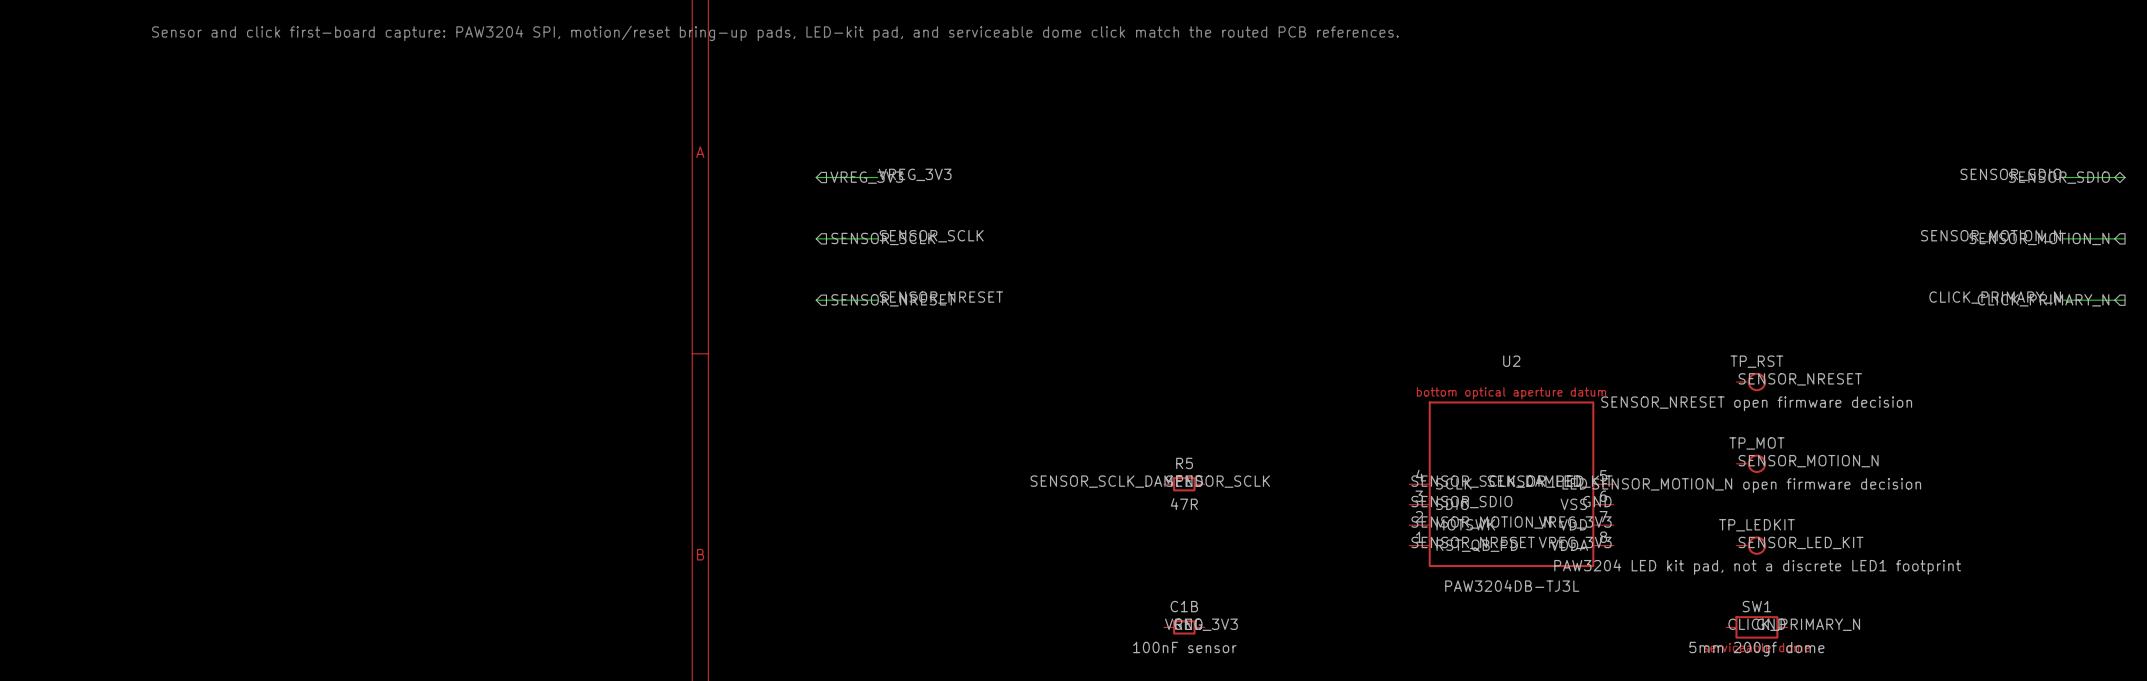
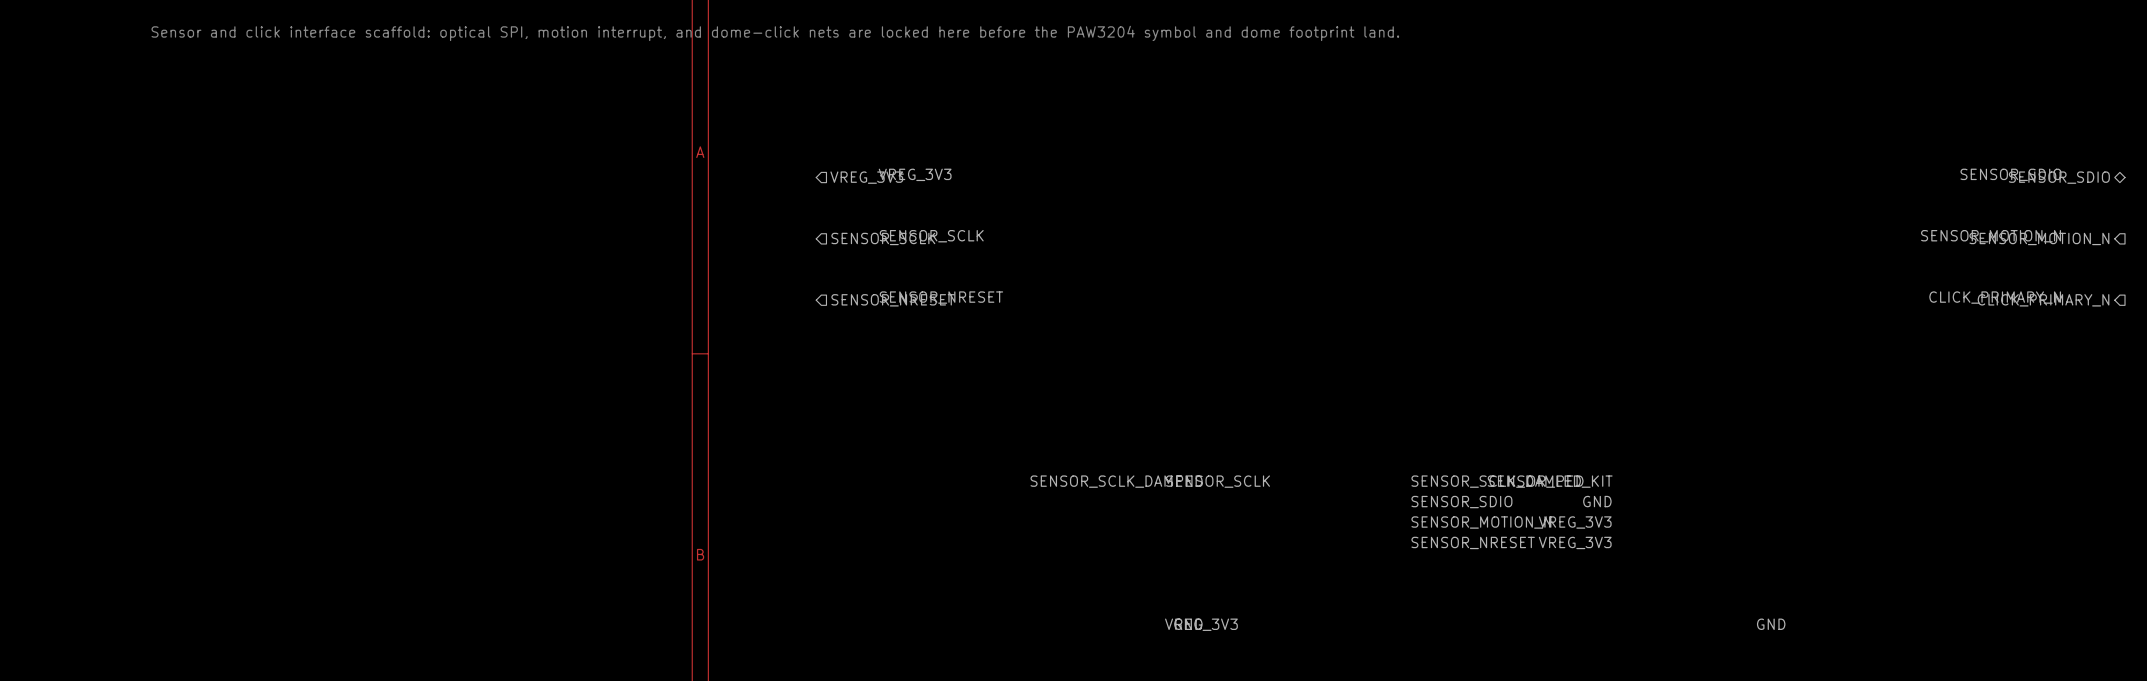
text: Sensor and click first-board capture: PAW3204 SPI, motion/reset bring-up pads, LED-kit pad, and serviceable dome click match the routed PCB references. (775, 33) -> Sensor and click interface scaffold: optical SPI, motion interrupt, and dome-click nets are locked here before the PAW3204 symbol and dome footprint land. (775, 33)
wire: (816, 177) (877, 177) -> none
wire: (2063, 177) (2125, 177) -> none
wire: (816, 238) (877, 238) -> none
wire: (2063, 238) (2125, 238) -> none
wire: (816, 300) (877, 300) -> none
wire: (2063, 300) (2125, 300) -> none
label: SENSOR_NRESET (1800, 379) -> none
TP_RST: SENSOR_NRESET open firmware decision (1751, 382) -> none
label: SENSOR_MOTION_N (1808, 461) -> none
TP_MOT: SENSOR_MOTION_N open firmware decision (1751, 463) -> none
R5: 47R (1184, 484) -> none
U2: PAW3204DB-TJ3L (1511, 484) -> none
label: SENSOR_LED_KIT (1801, 542) -> none
TP_LEDKIT: PAW3204 LED kit pad, not a discrete LED1 footprint (1751, 545) -> none
label: CLICK_PRIMARY_N (1794, 624) -> none
C1B: 100nF sensor (1184, 627) -> none
SW1: 5mm 200gf dome (1756, 627) -> none

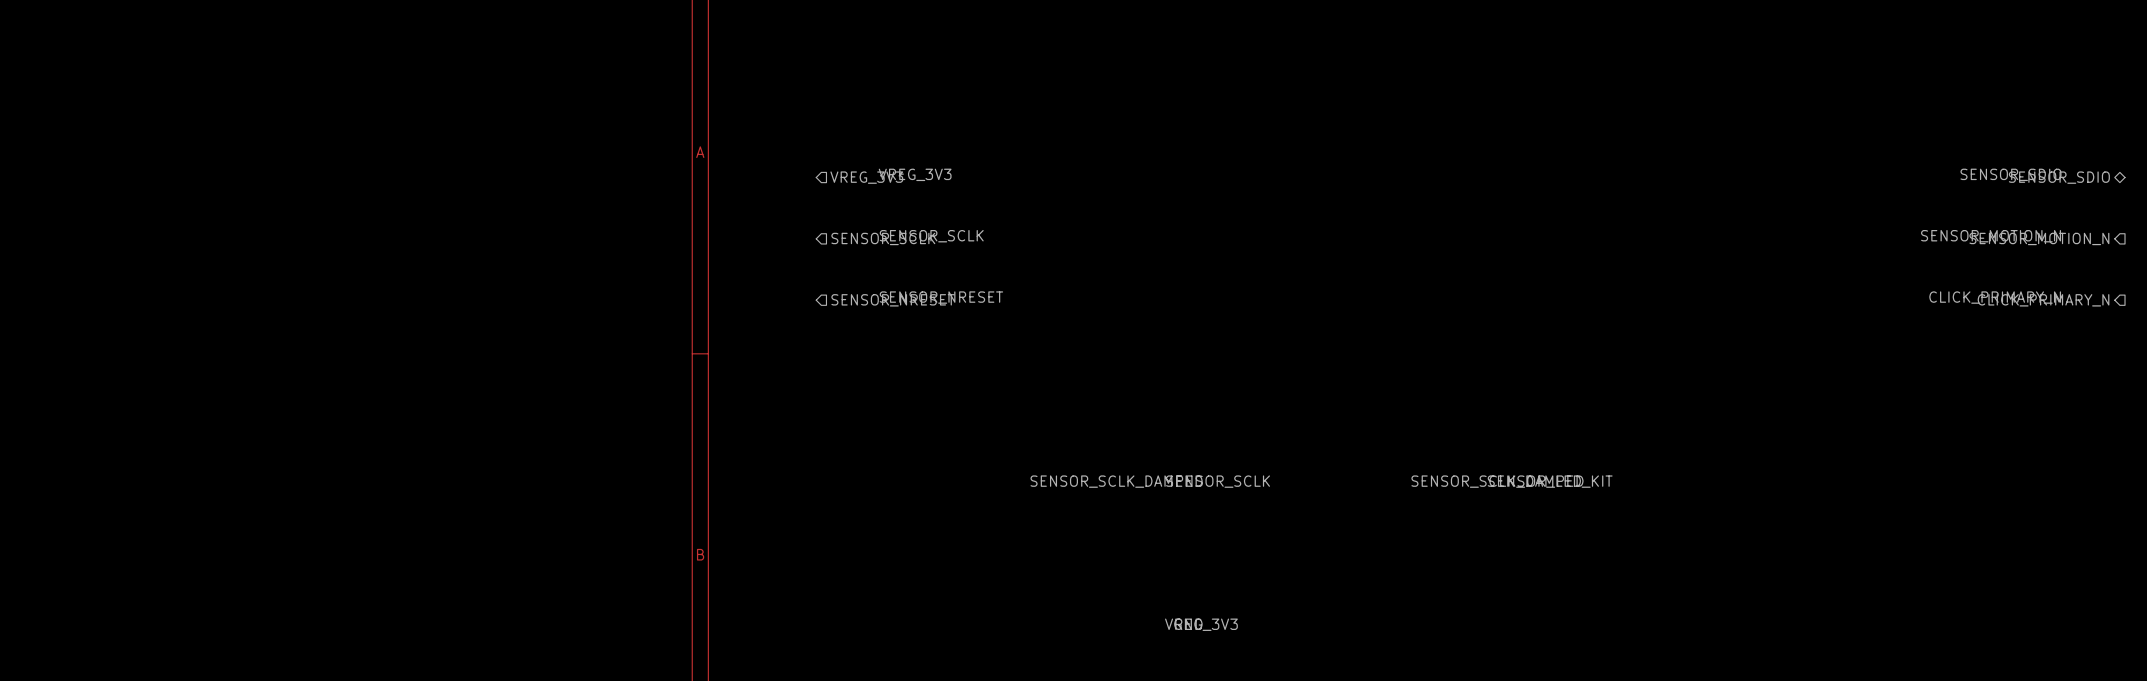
text: Sensor and click interface scaffold: optical SPI, motion interrupt, and dome-click nets are locked here before the PAW3204 symbol and dome footprint land. (775, 33) -> none
label: GND (1597, 501) -> none
label: SENSOR_SDIO (1461, 502) -> none
label: SENSOR_MOTION_N (1481, 522) -> none
label: VREG_3V3 (1575, 522) -> none
label: SENSOR_NRESET (1473, 542) -> none
label: VREG_3V3 (1575, 542) -> none
label: GND (1771, 624) -> none

